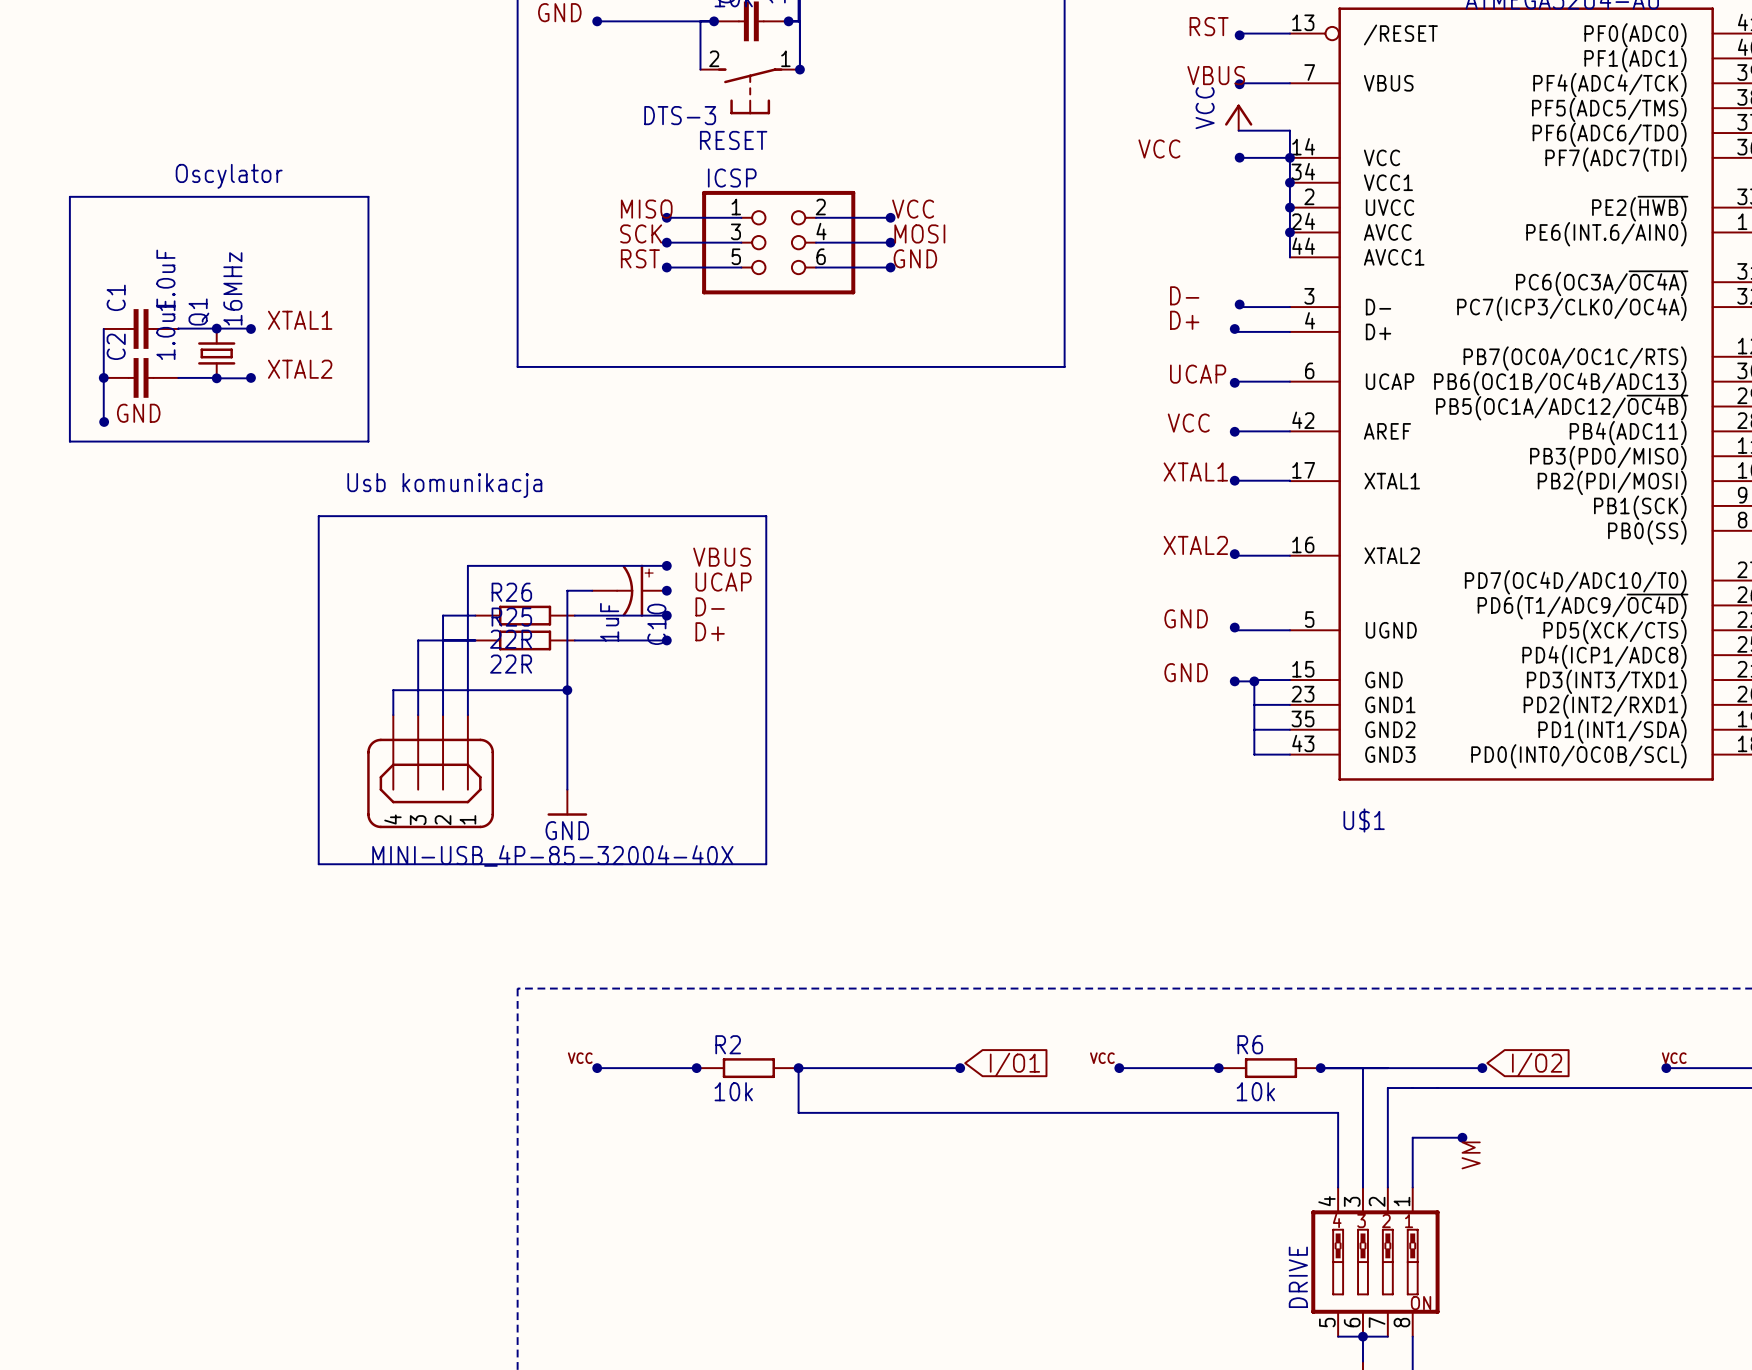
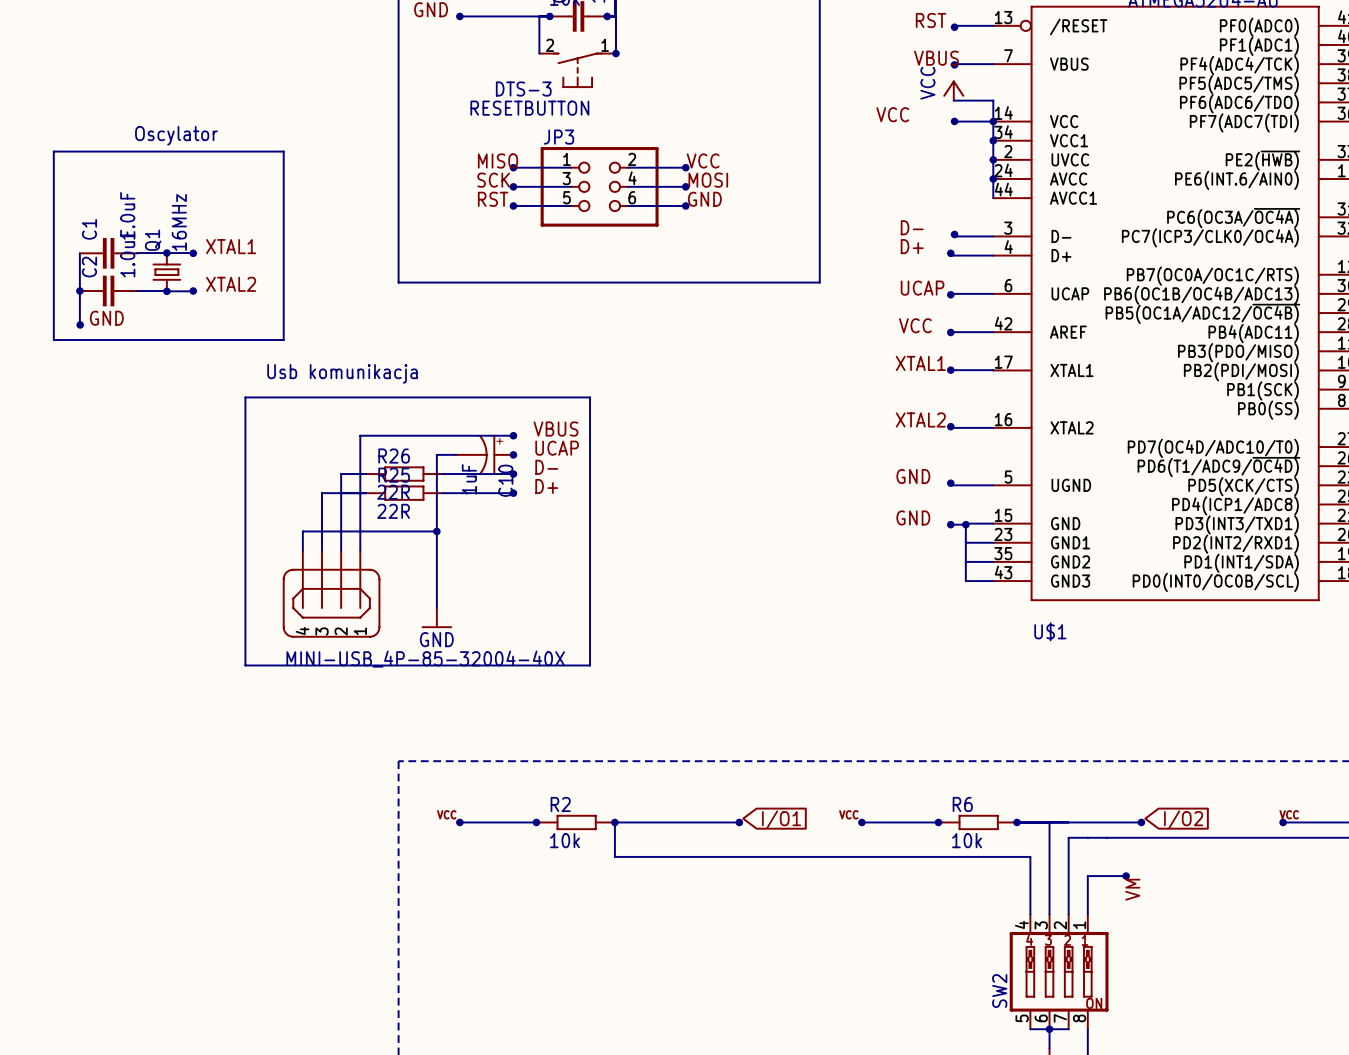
RESET name: RESET (733, 140) -> RESETBUTTON (529, 108)
ICSP name: ICSP (732, 178) -> JP3 (558, 137)
DRIVE name: DRIVE (1298, 1277) -> SW2 (999, 991)

